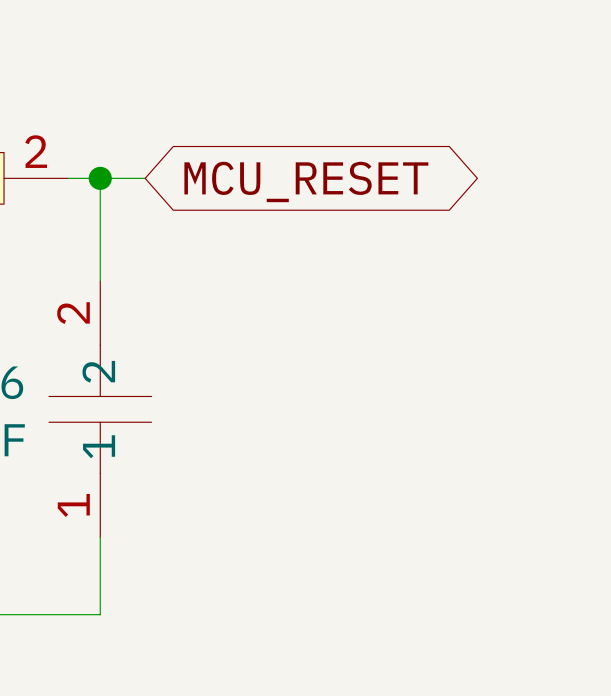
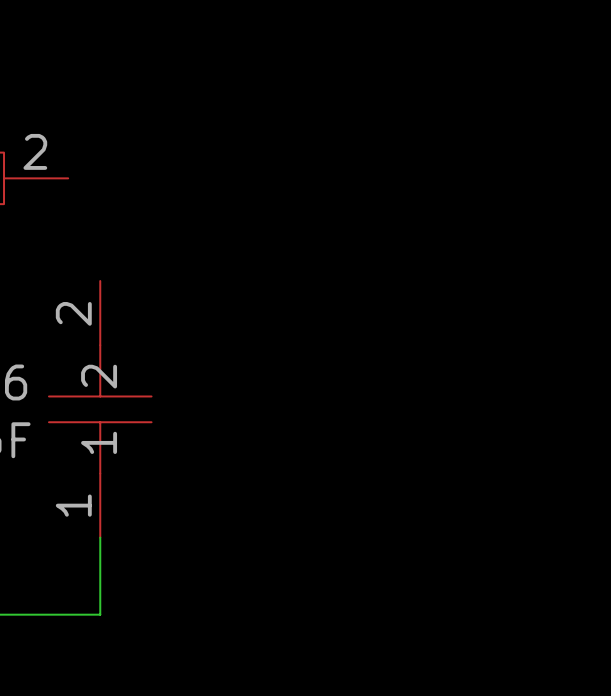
wire: (68, 178) (145, 178) -> none
wire: (100, 178) (100, 281) -> none
junction: (100, 178) -> none
global label: MCU_RESET (306, 181) -> none

